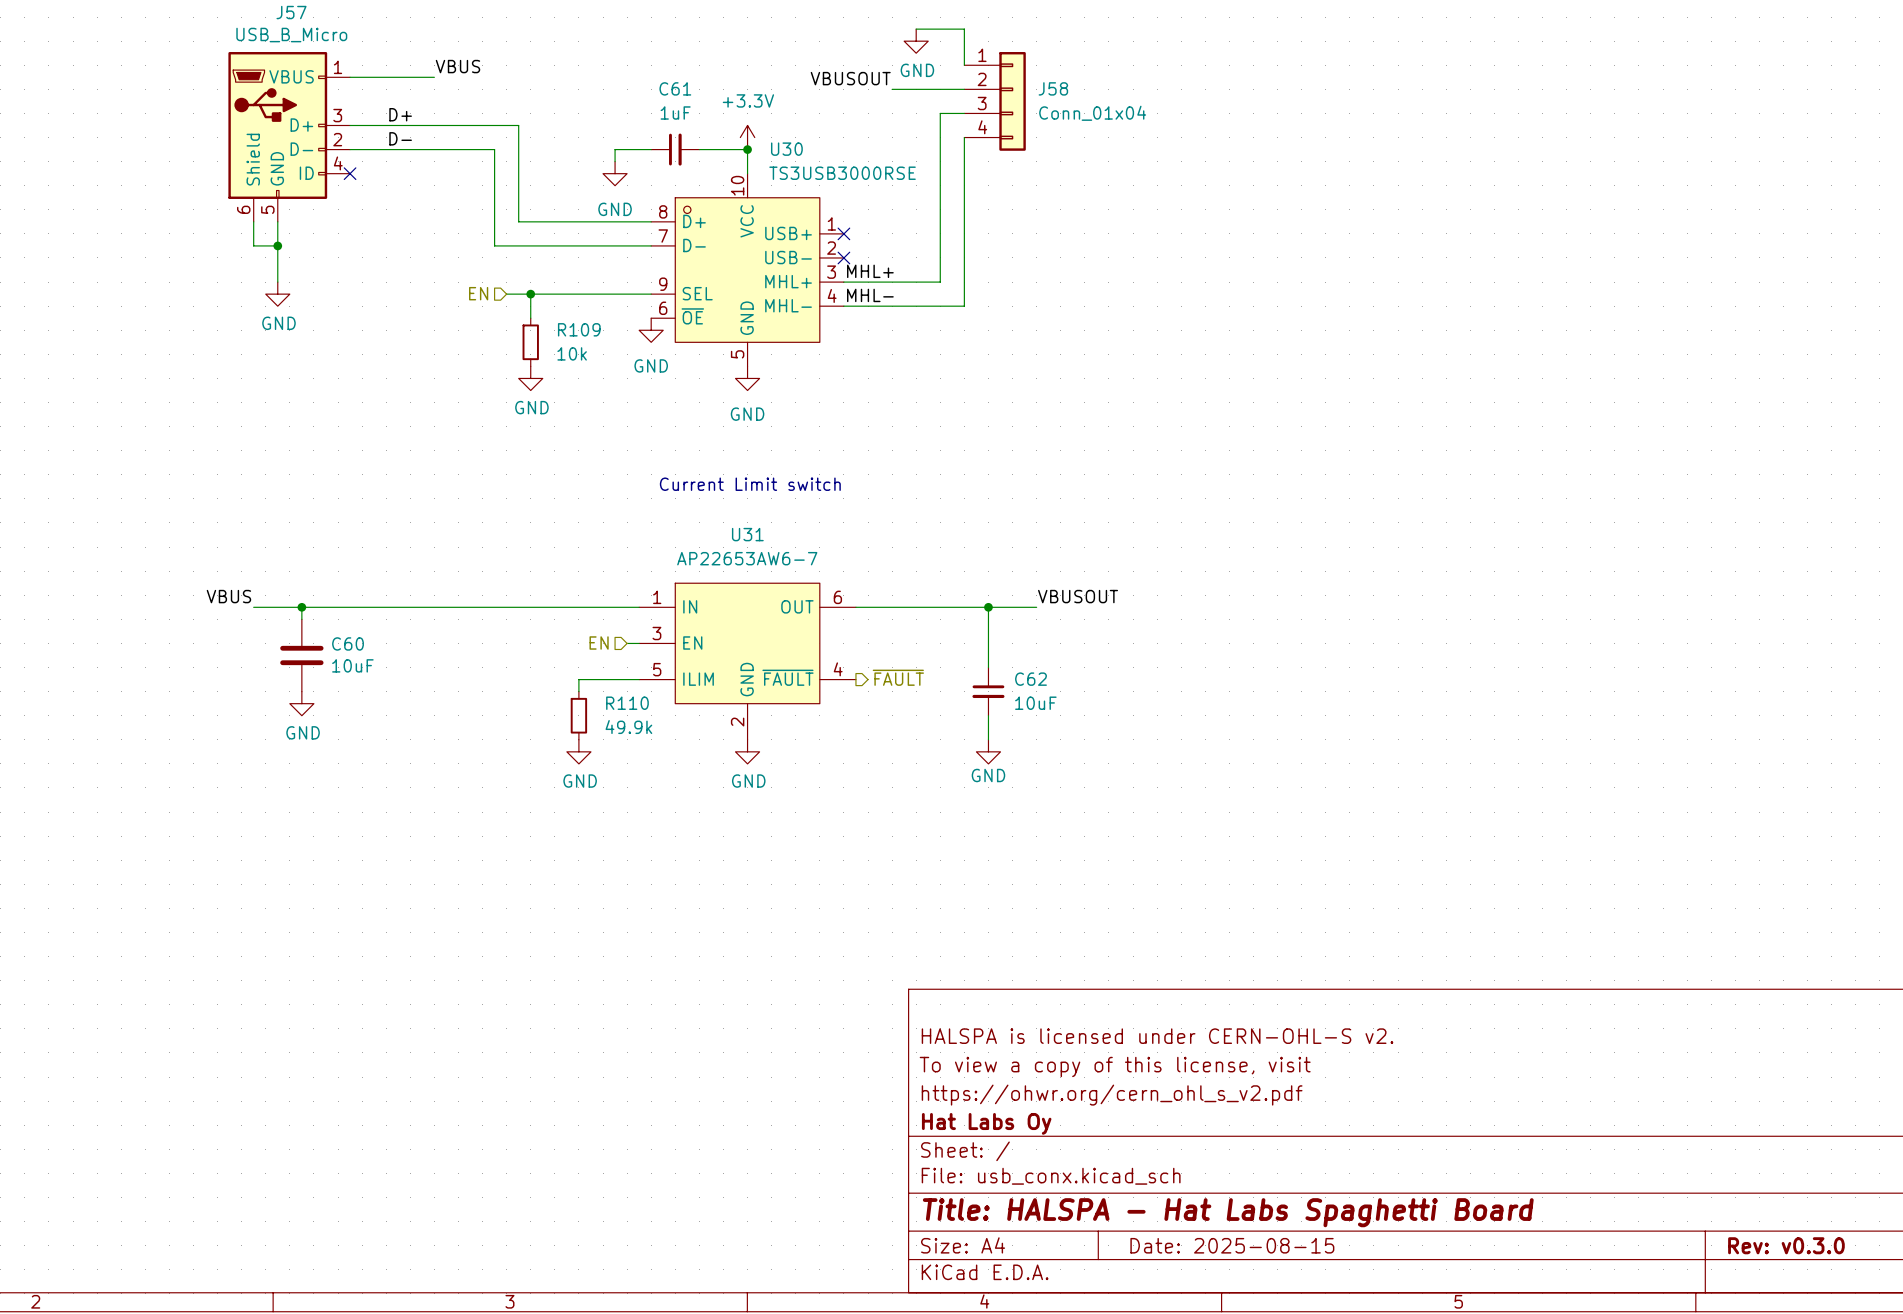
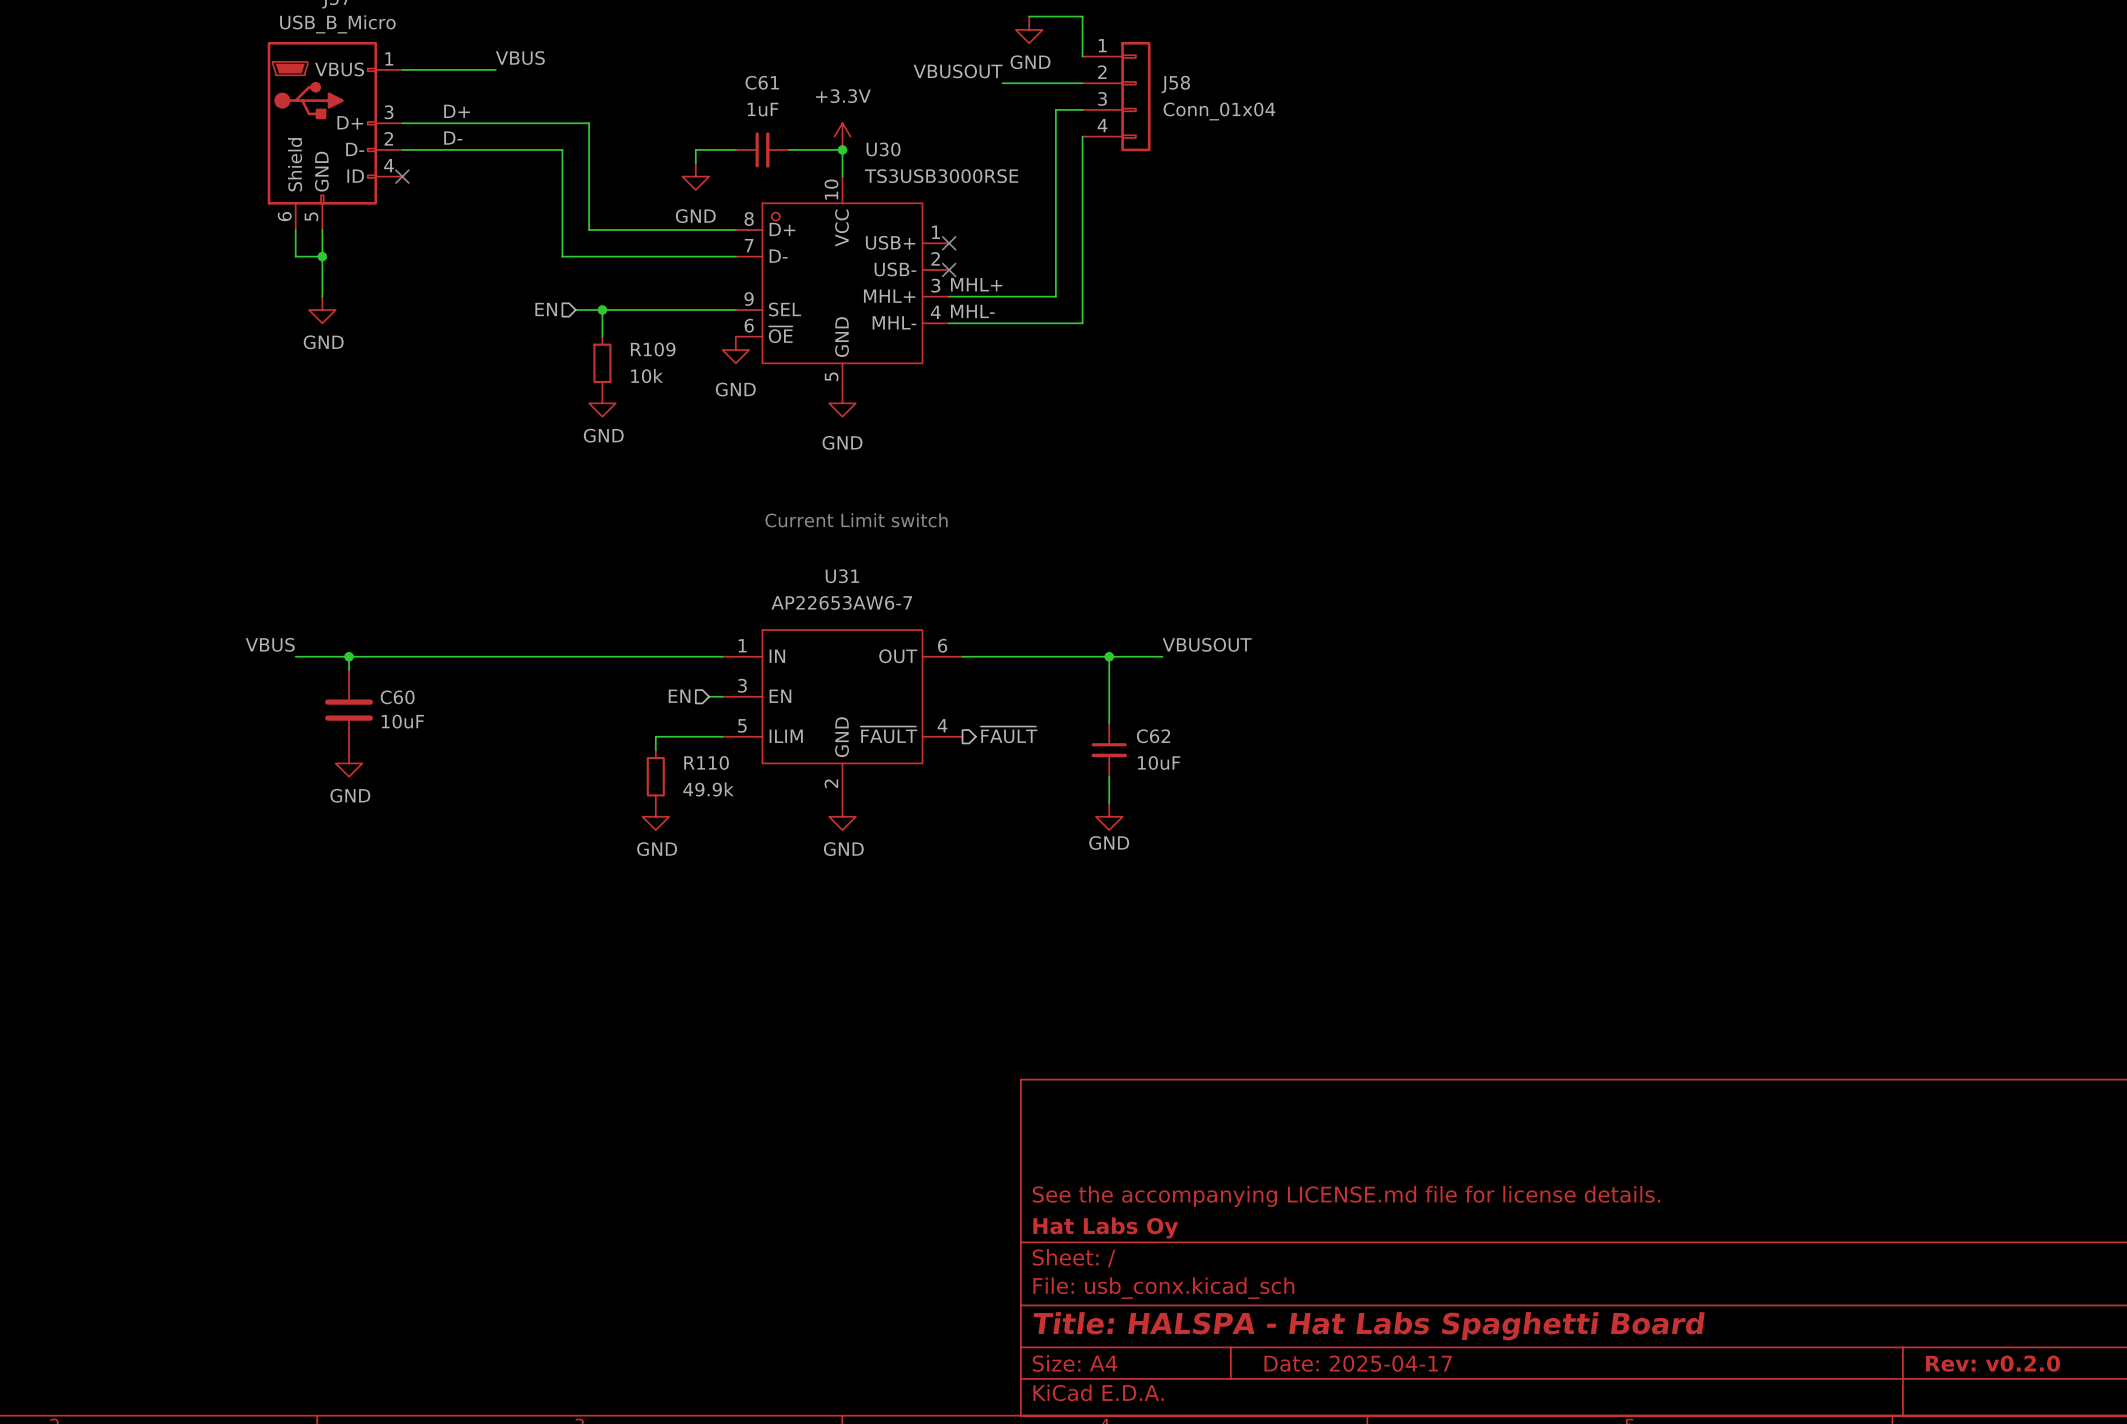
title block: HALSPA is licensed under CERN-OHL-S v2. (1157, 1036) -> none
title block: To view a copy of this license, visit (1115, 1066) -> none
title block: https://ohwr.org/cern_ohl_s_v2.pdf (1112, 1095) -> See the accompanying LICENSE.md file for license details. (1346, 1196)
title block: Date: 2025-08-15 (1232, 1245) -> Date: 2025-04-17 (1358, 1363)
title block: Rev: v0.3.0 (1786, 1245) -> Rev: v0.2.0 (1992, 1363)

